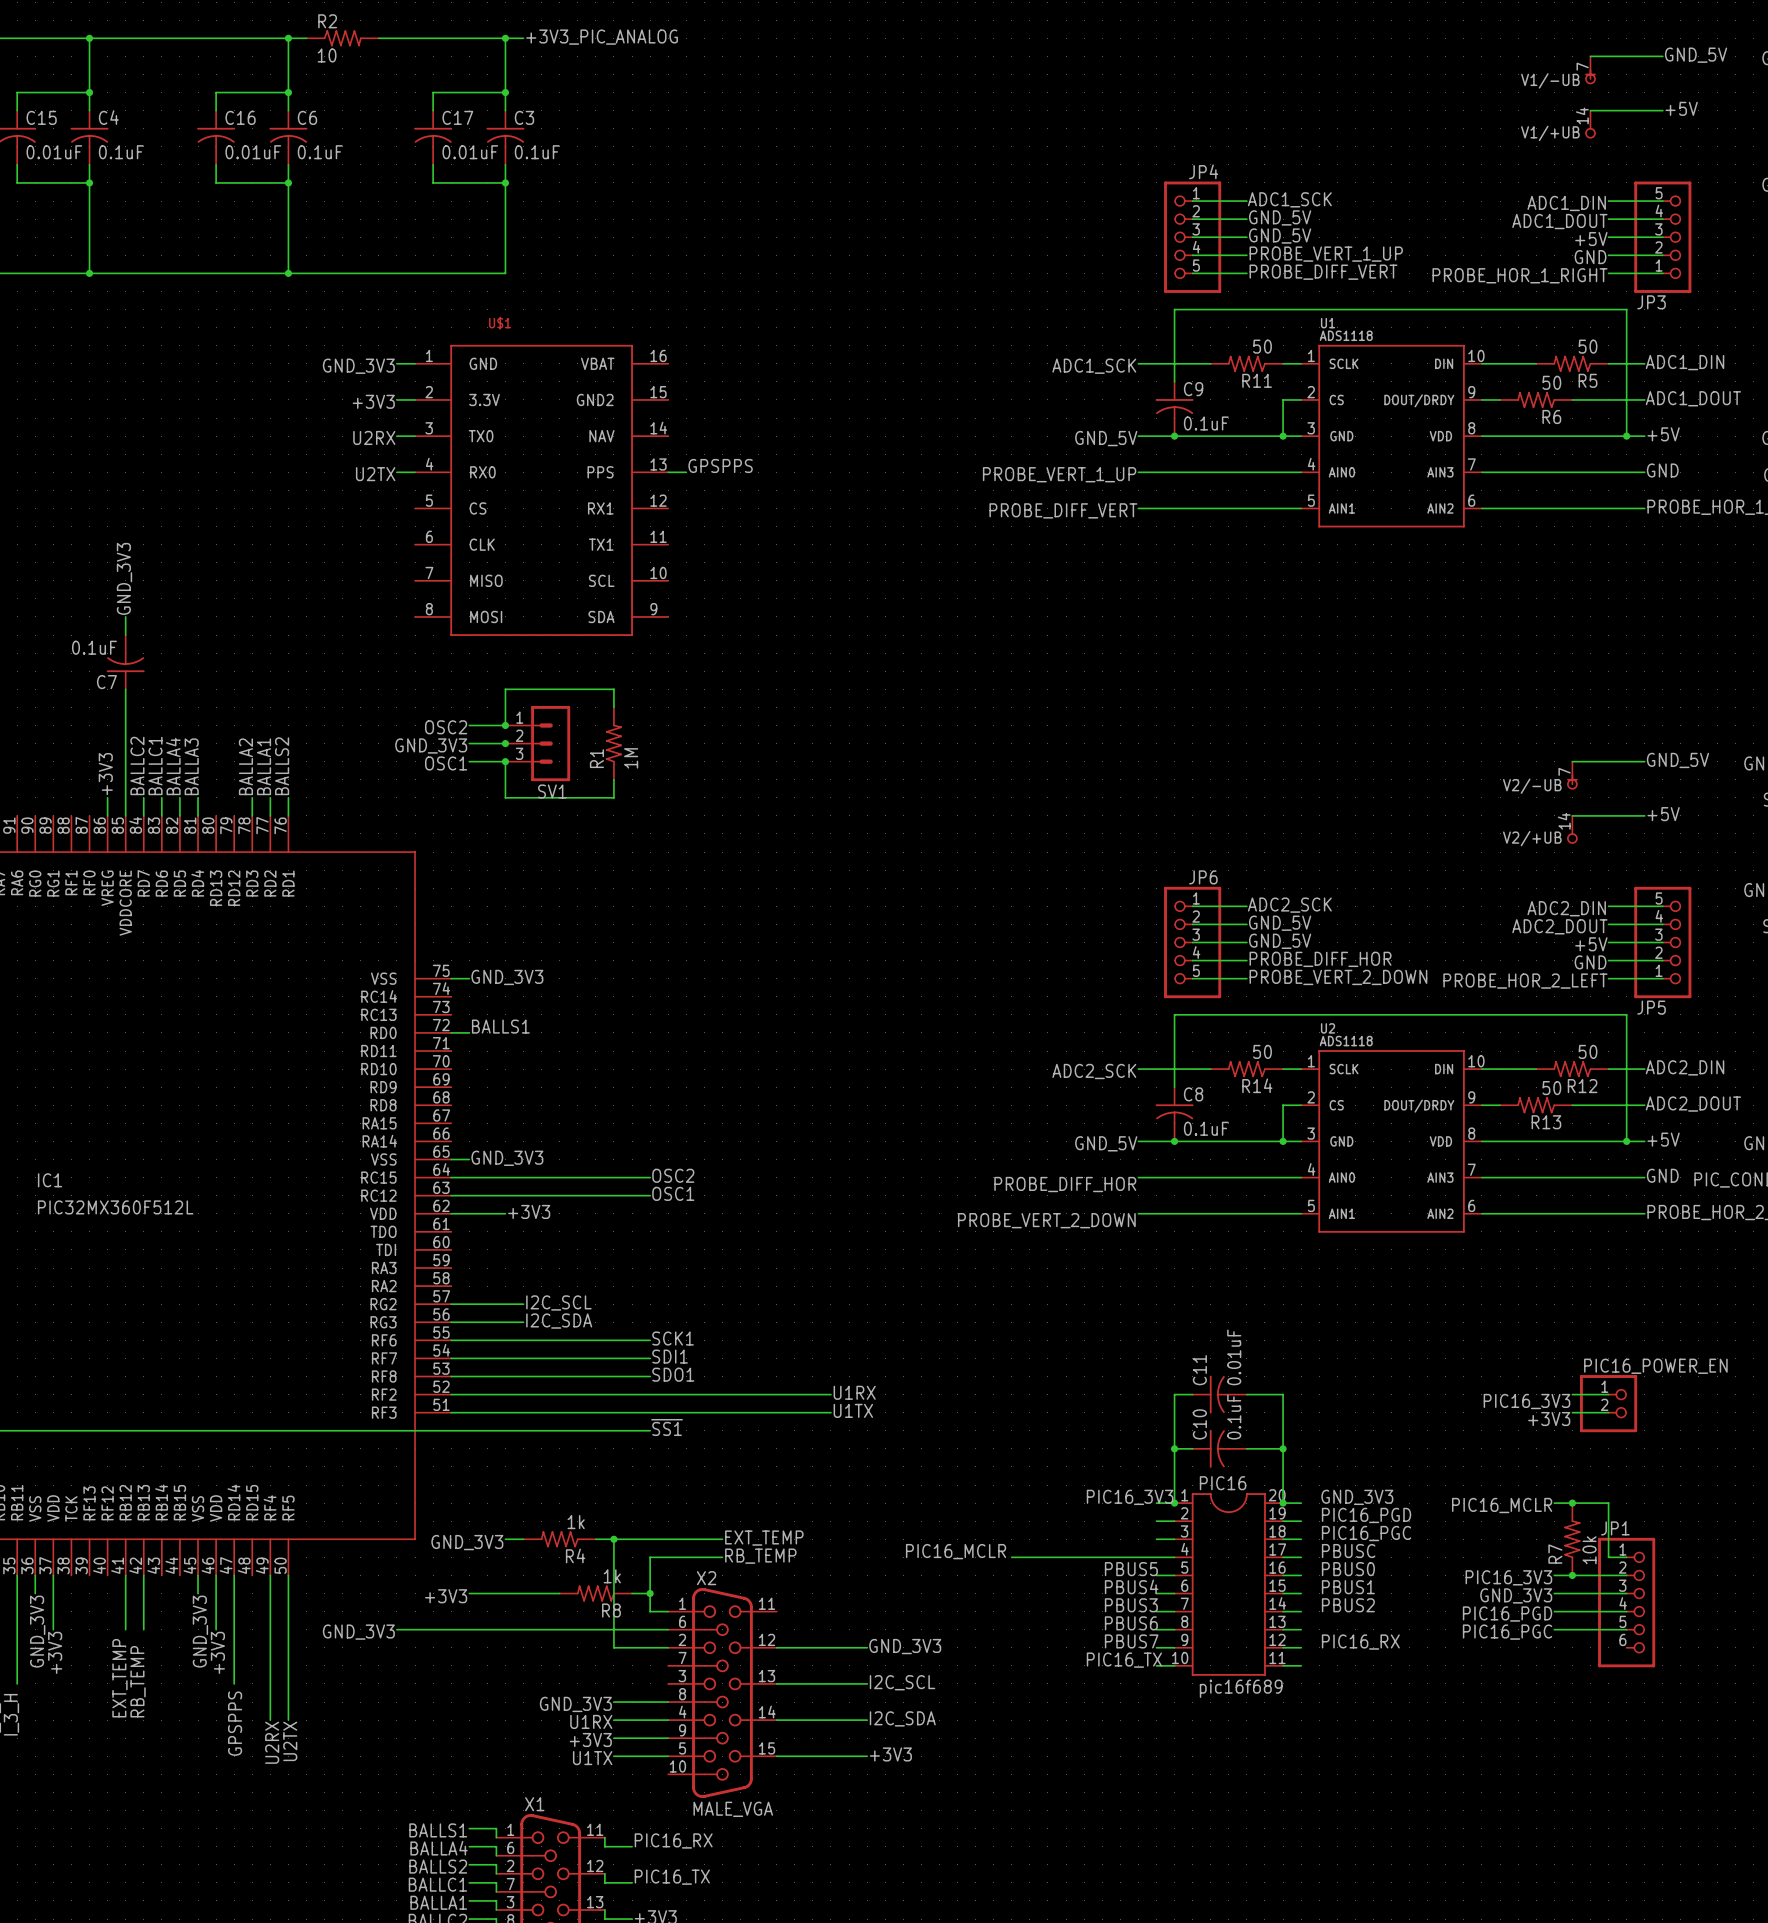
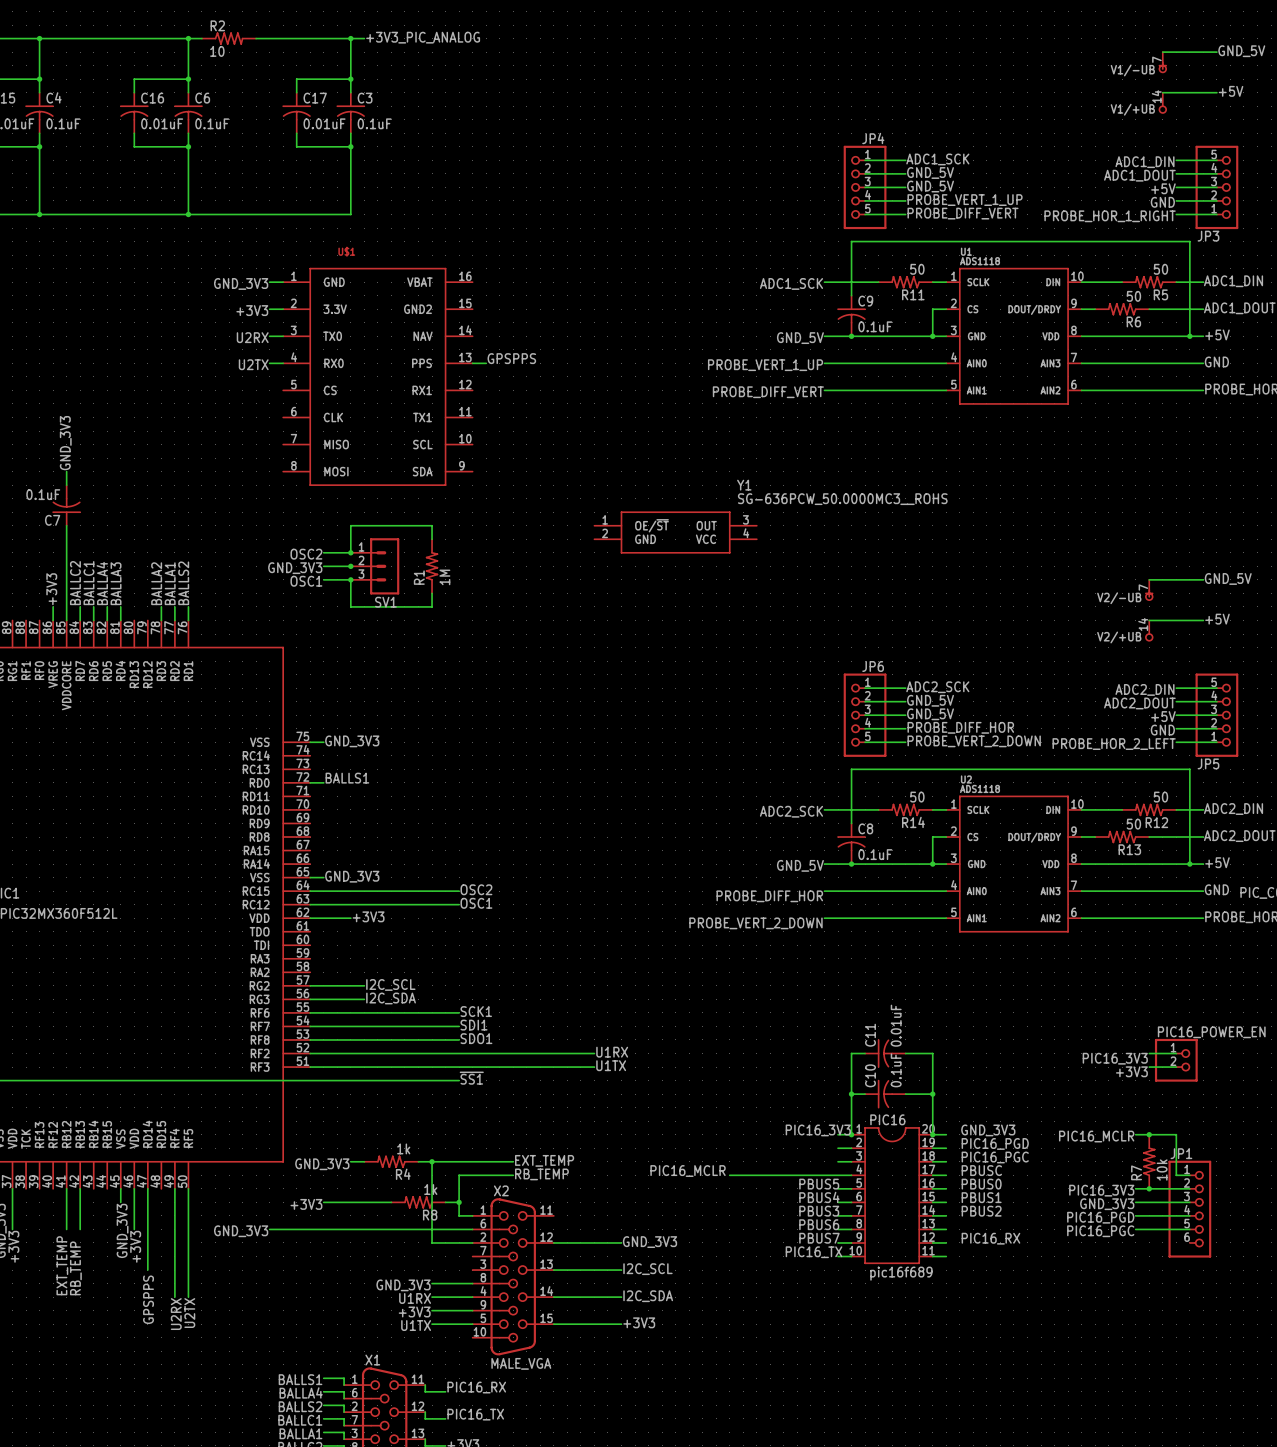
Y1: none -> SG-636PCW_50.0000MC3__ROHS (675, 532)

